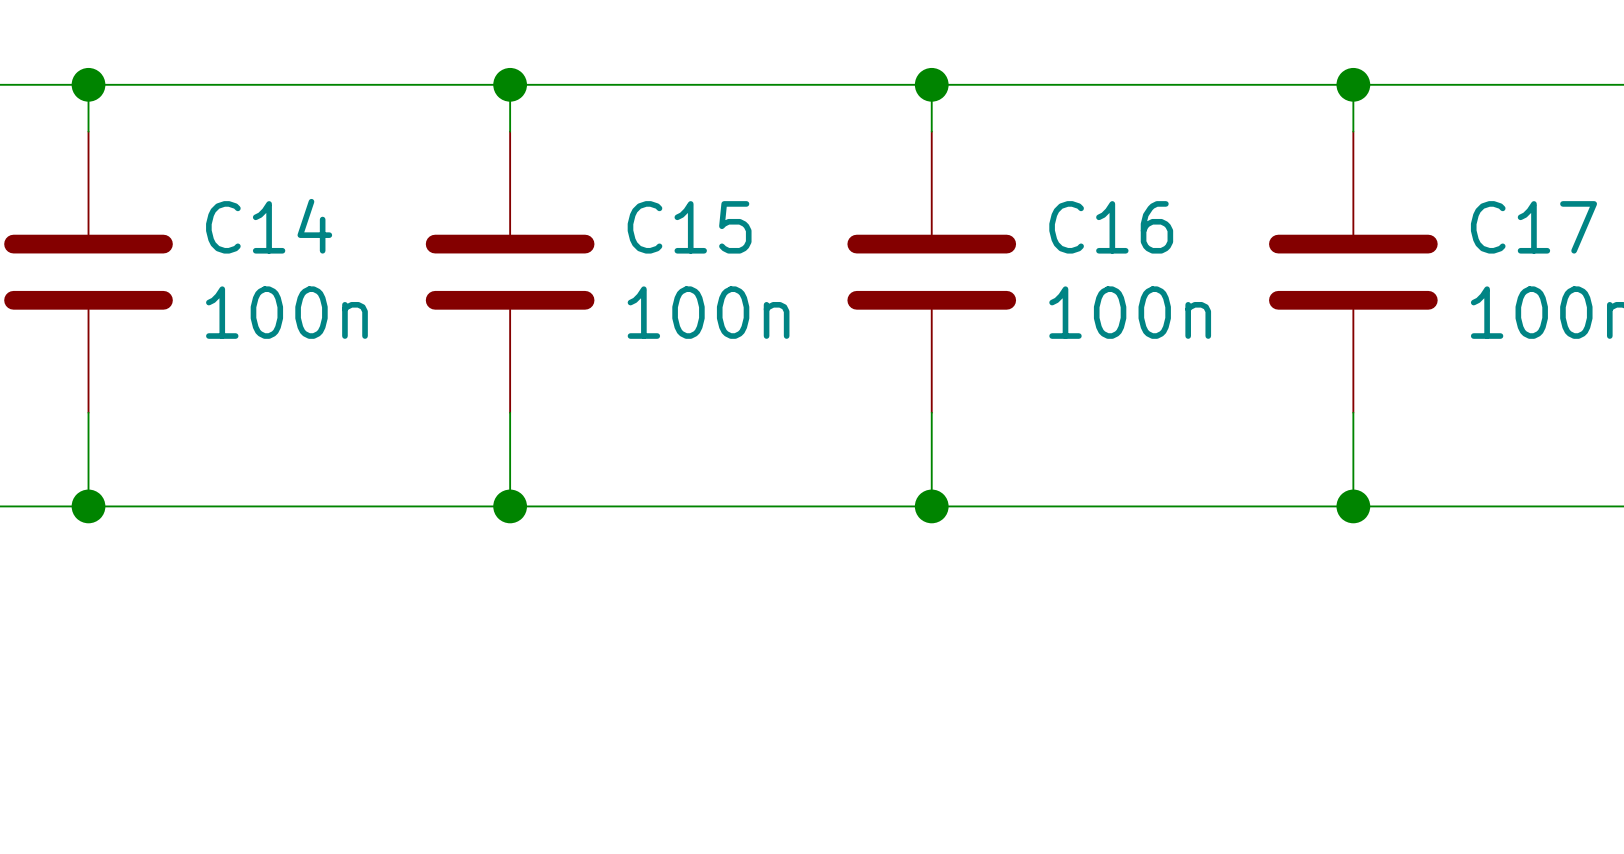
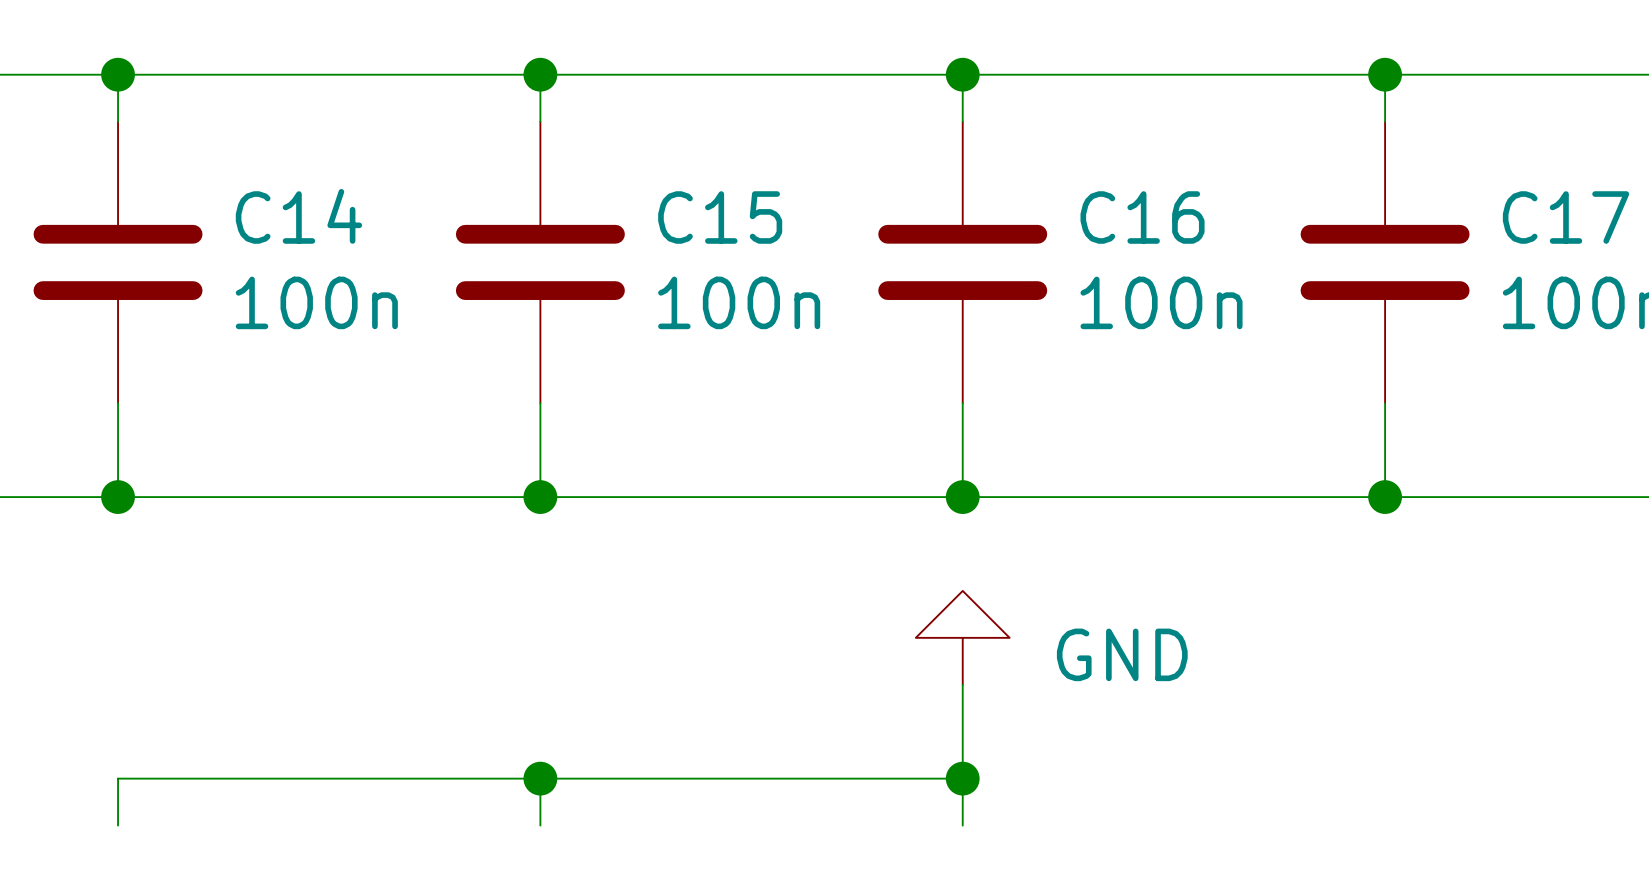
power symbol: none -> GND (962, 637)
wire: none -> (962, 684) (962, 825)
wire: none -> (540, 778) (540, 825)
junction: none -> (540, 778)
wire: none -> (962, 778) (118, 778) (118, 825)
junction: none -> (962, 778)

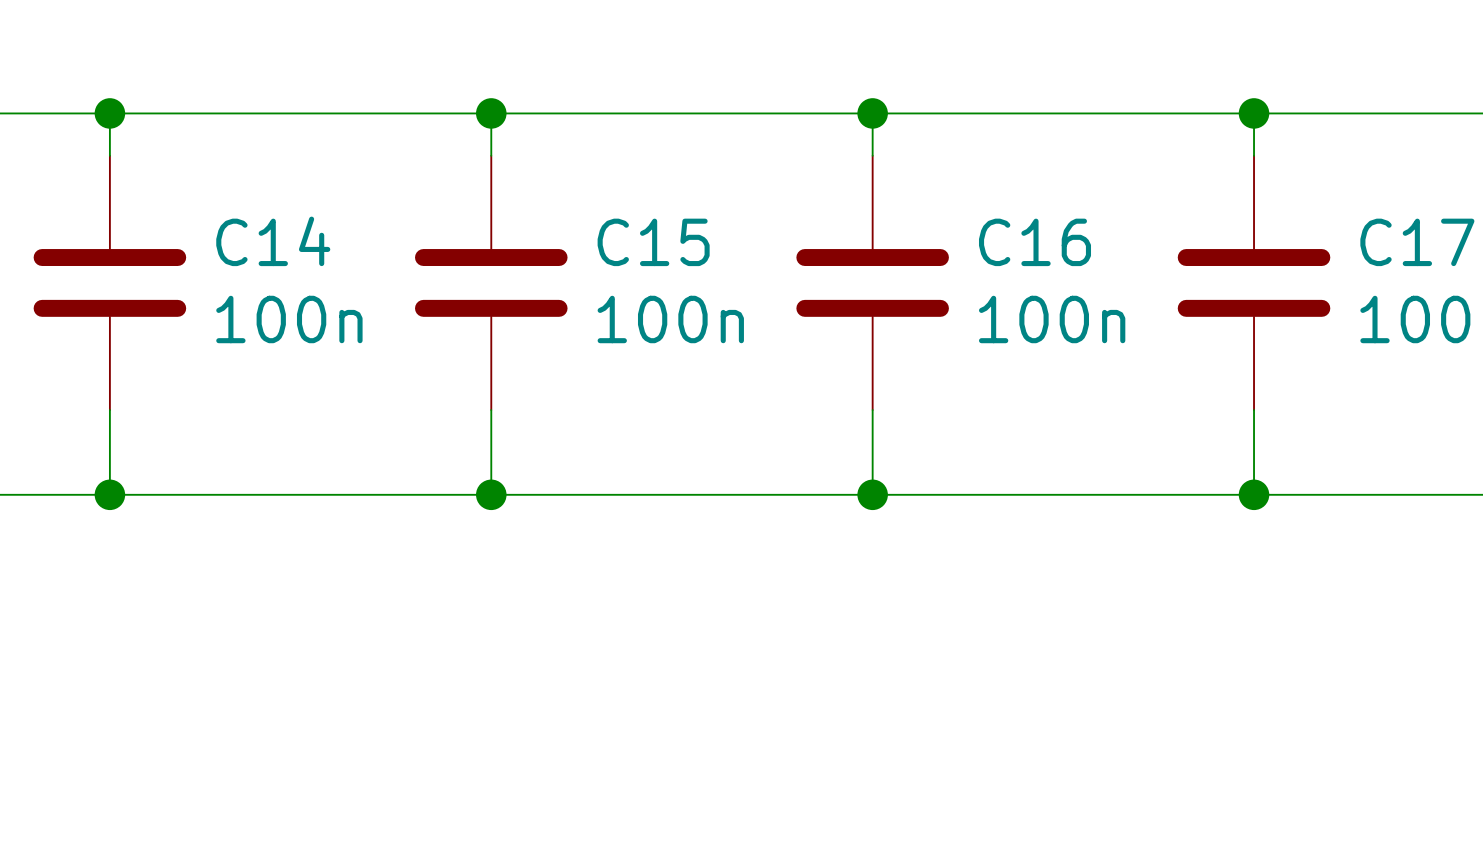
power symbol: GND (962, 637) -> none
wire: (962, 684) (962, 825) -> none
wire: (540, 778) (540, 825) -> none
junction: (540, 778) -> none
wire: (962, 778) (118, 778) (118, 825) -> none
junction: (962, 778) -> none

